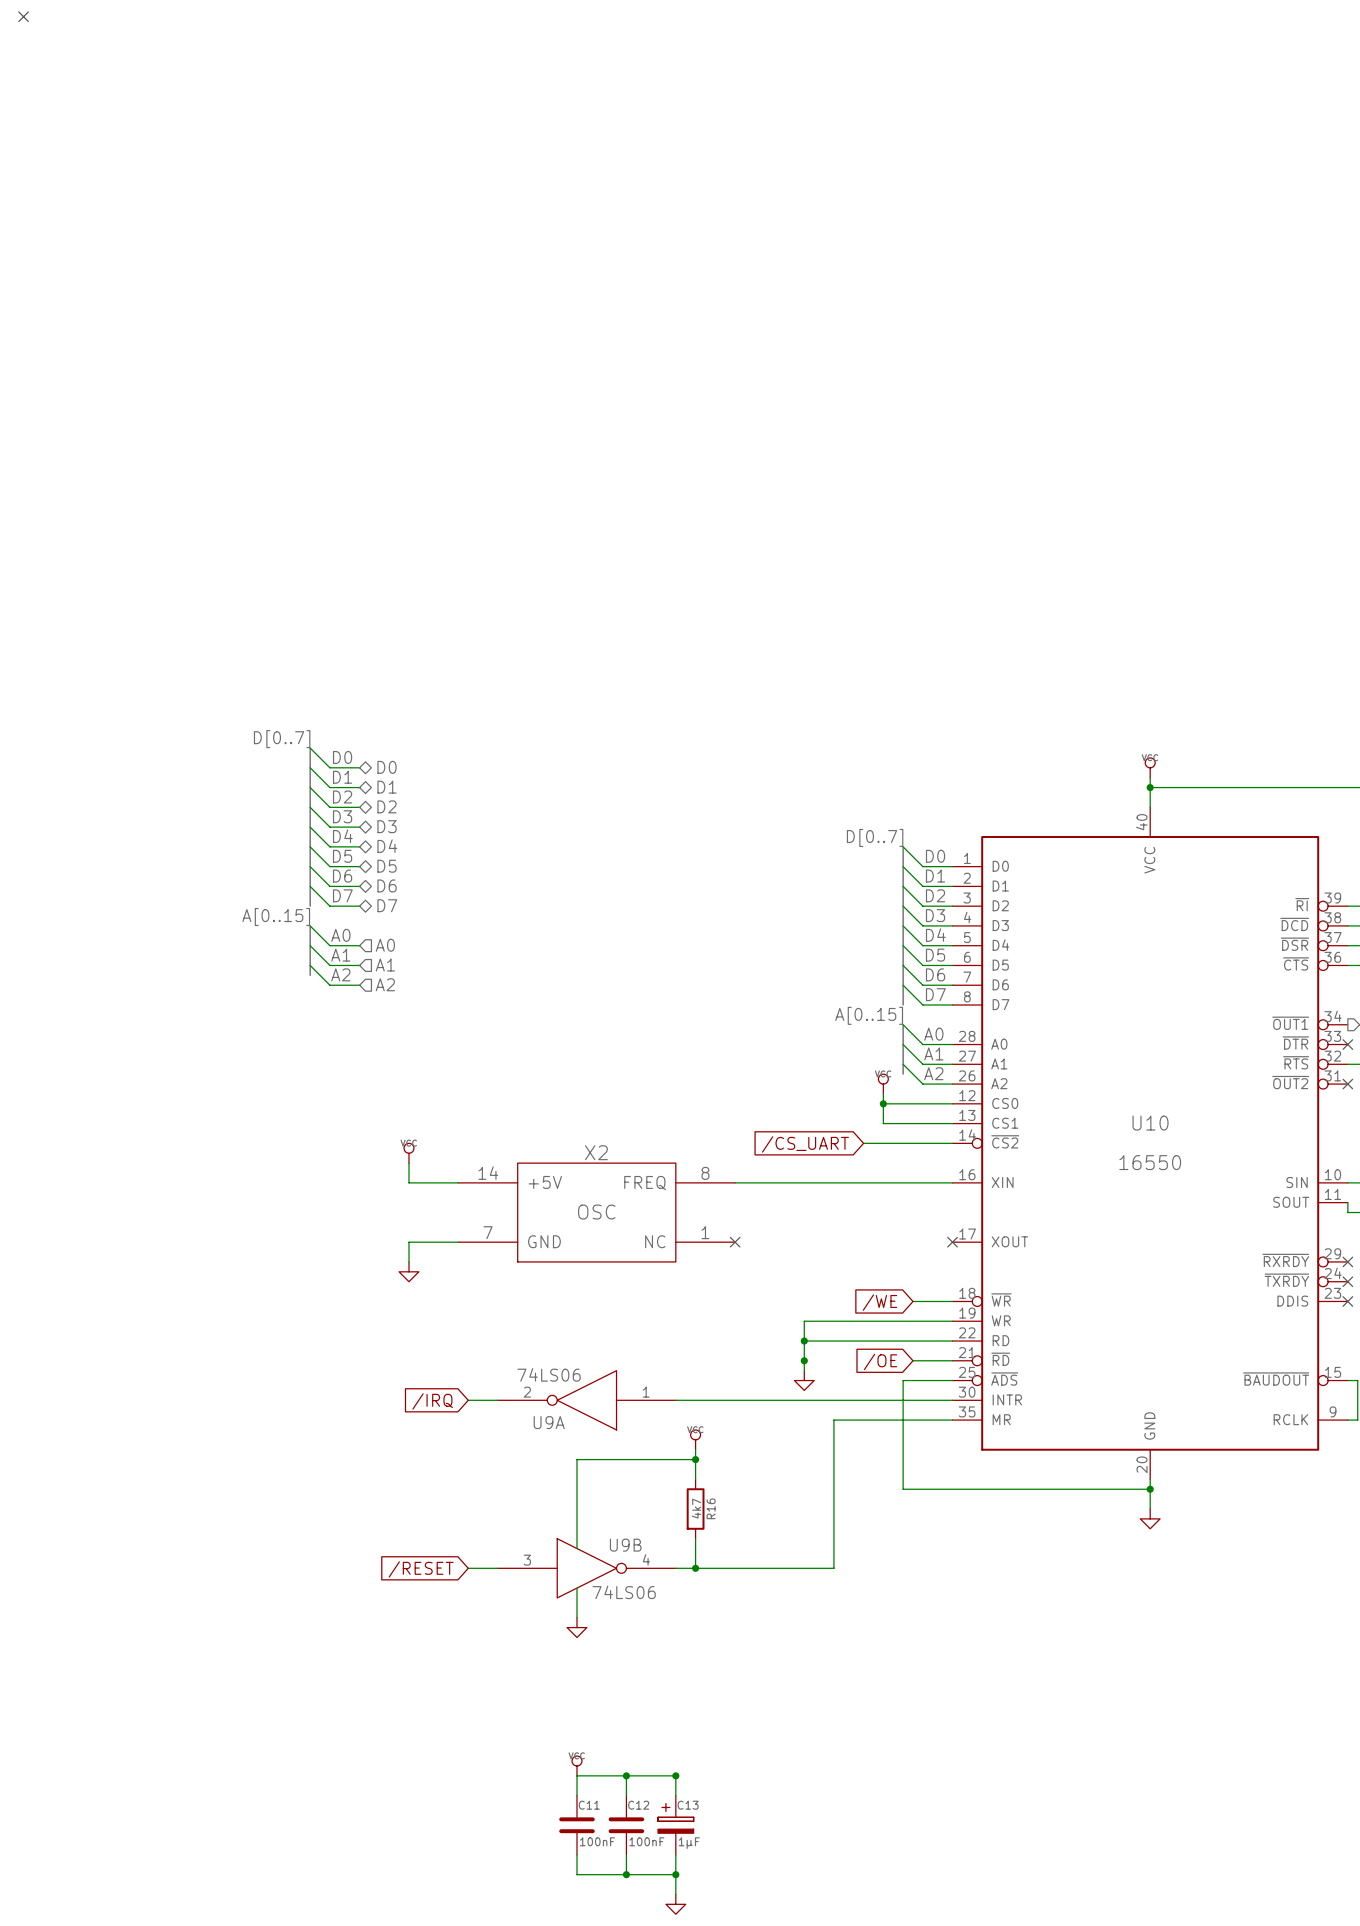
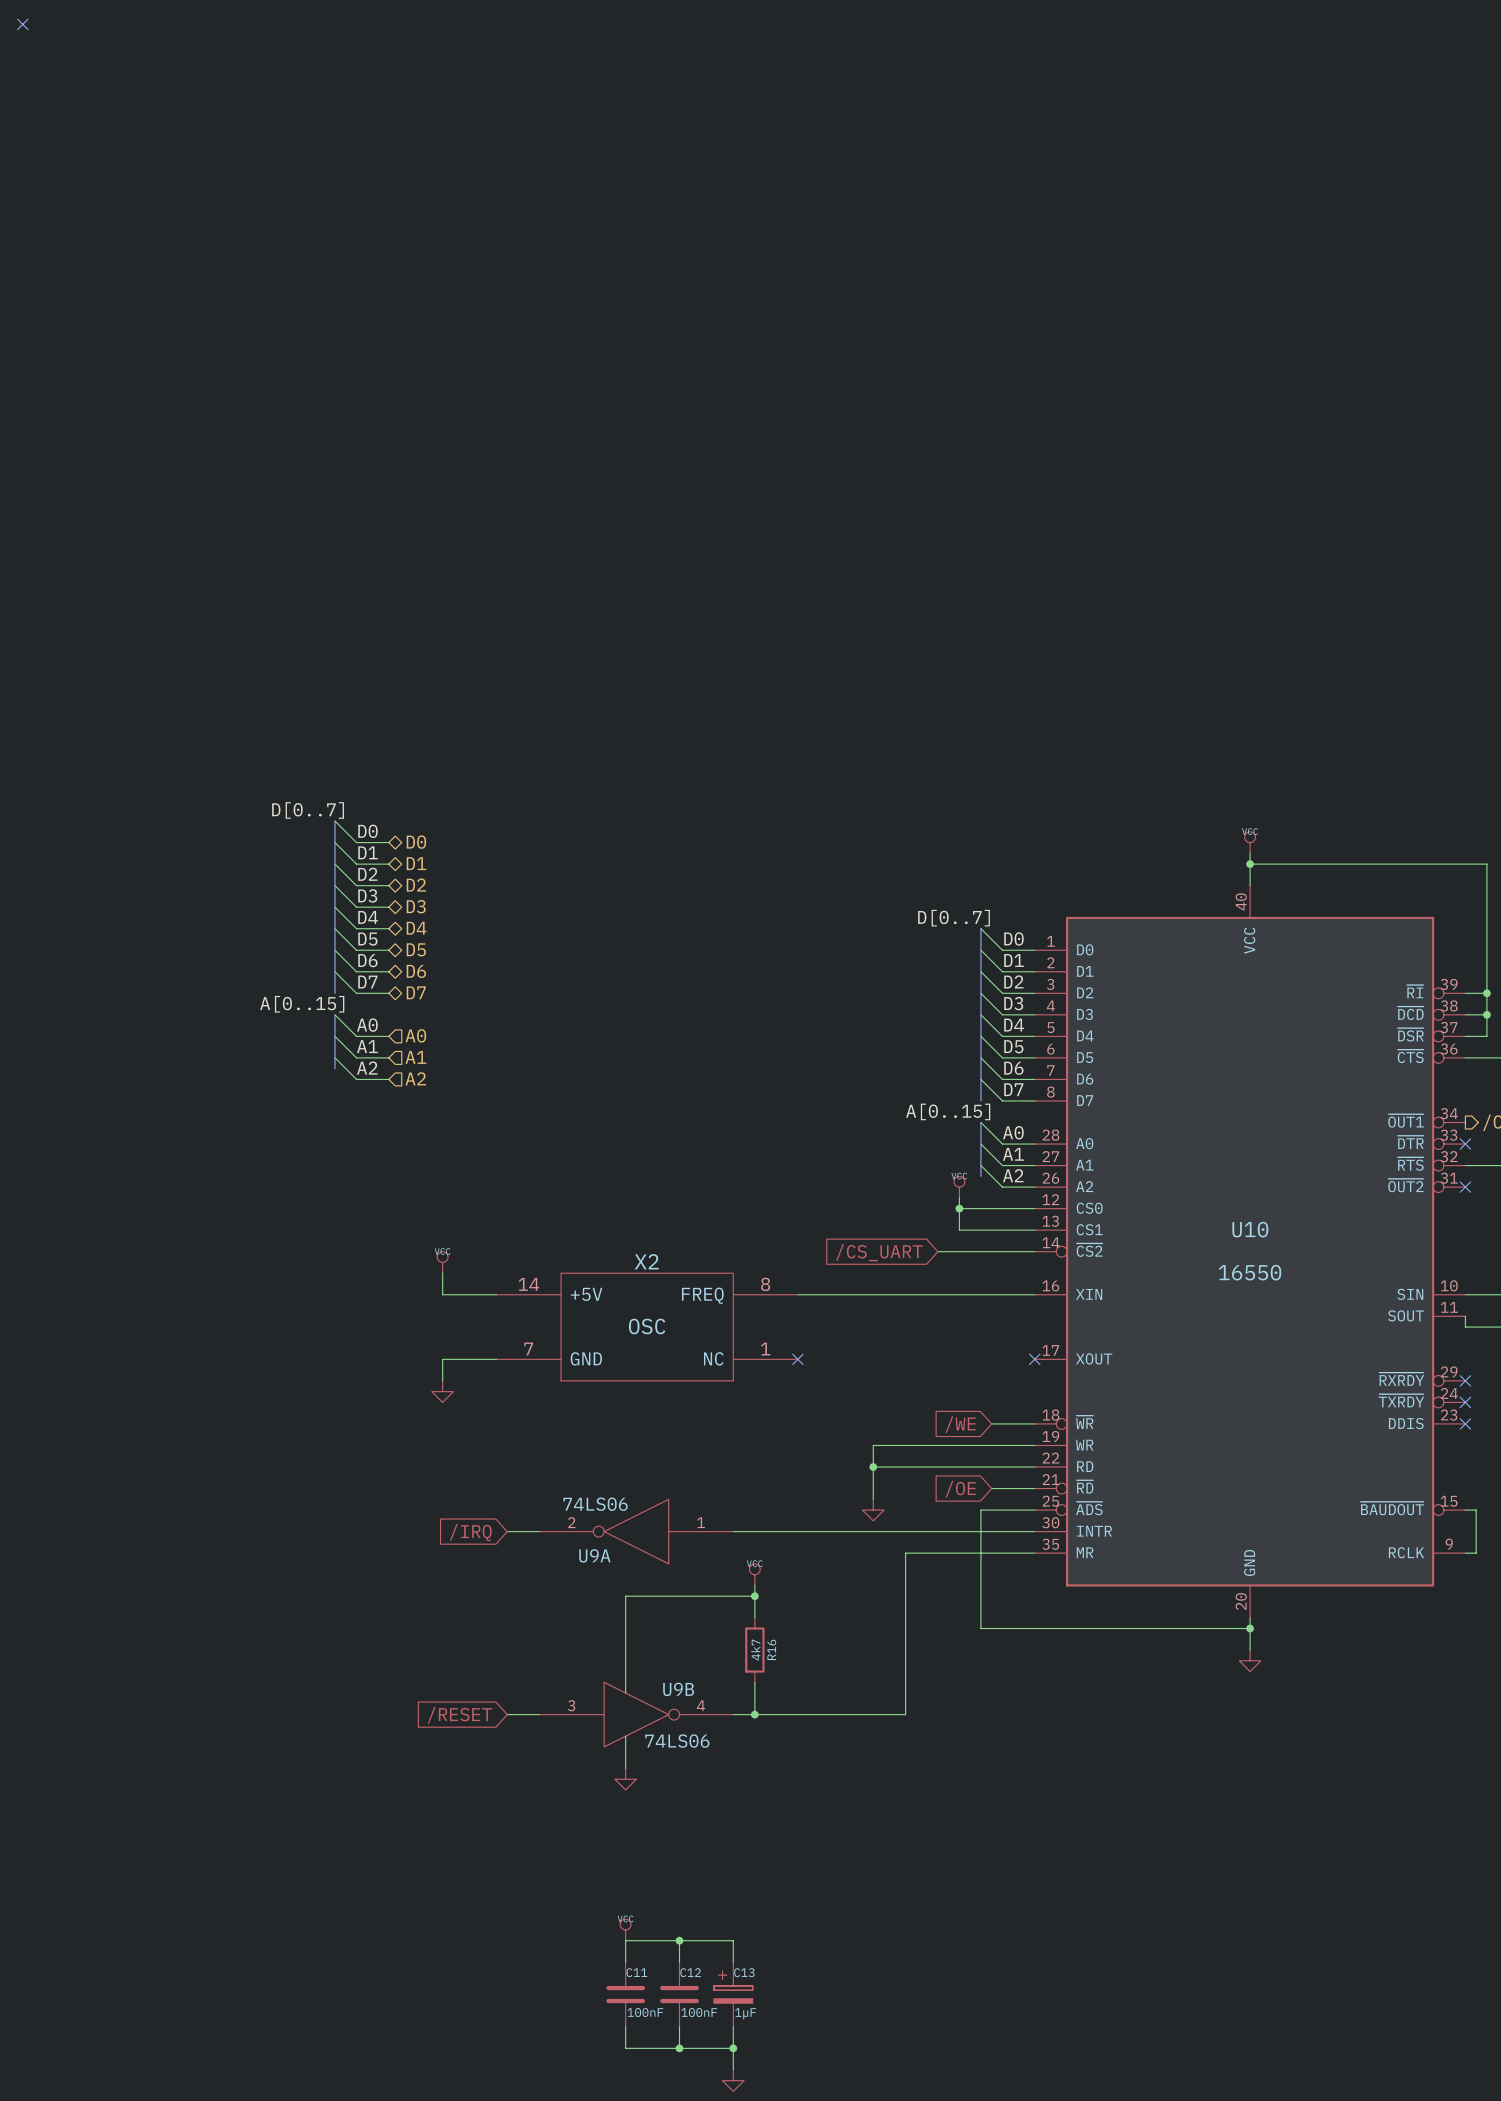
junction: (804, 1360) -> none
junction: (675, 1775) -> none

